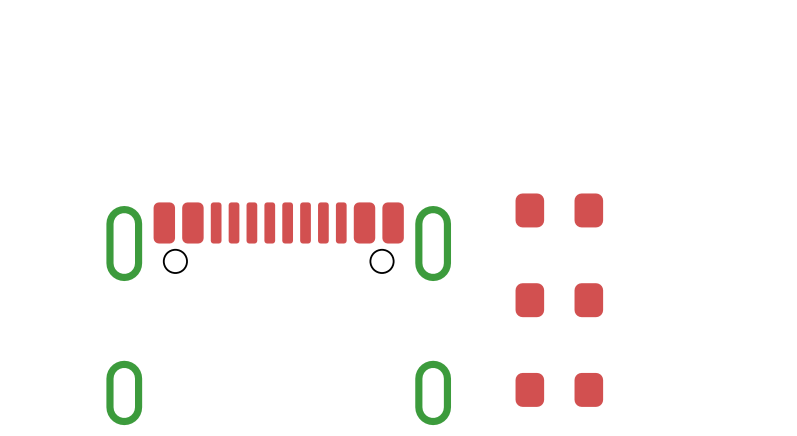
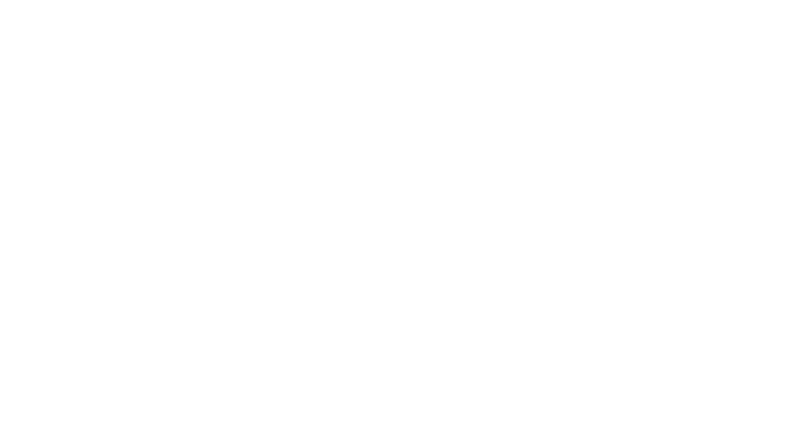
part: (559, 210) -> none
part: (559, 300) -> none
part: (278, 313) -> none
part: (559, 389) -> none

